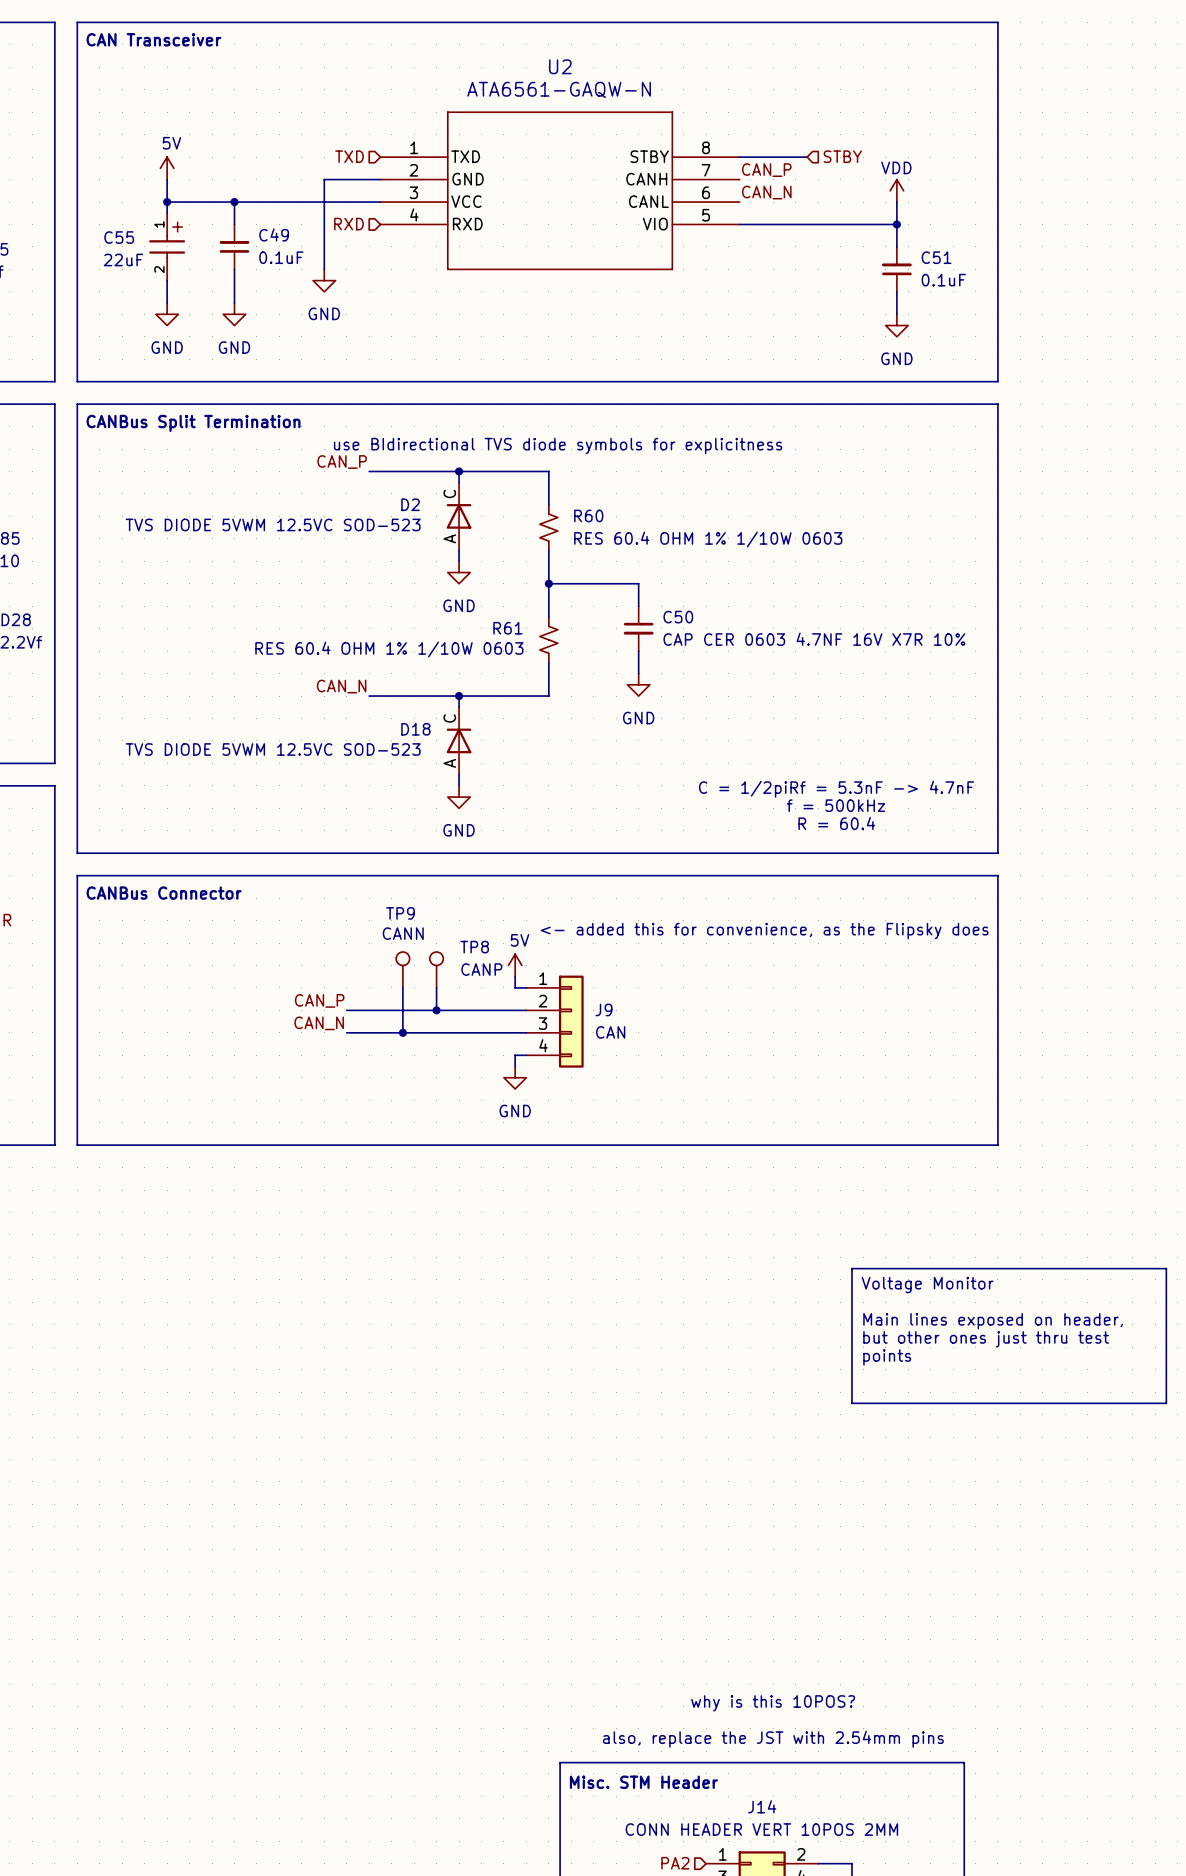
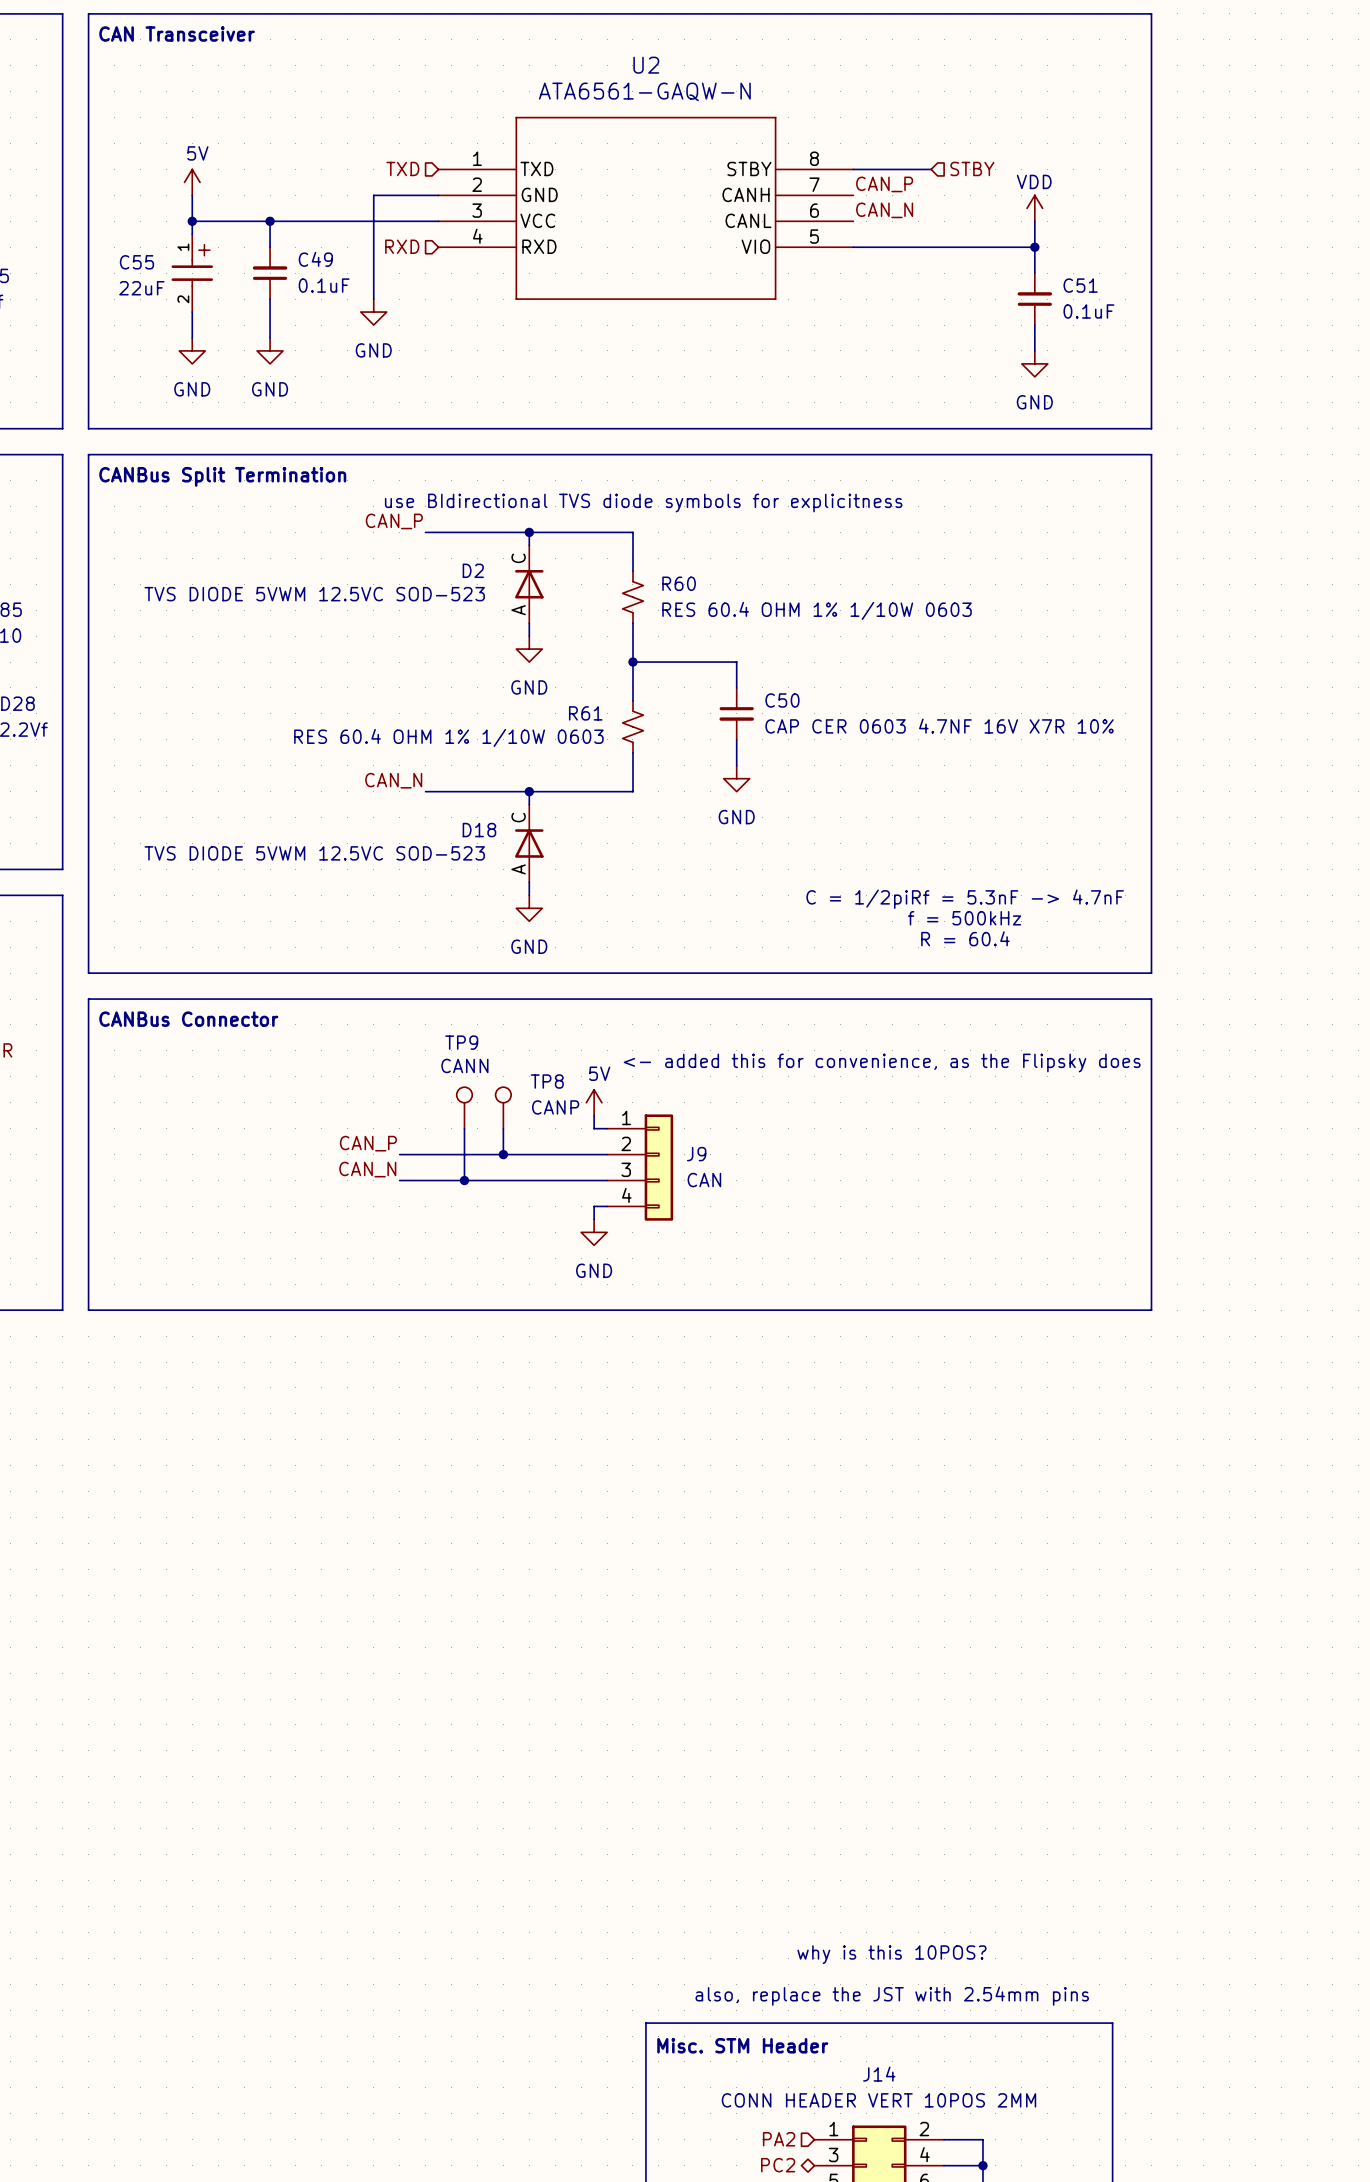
line: (851, 1268) (1166, 1268) (1166, 1403) (851, 1403) (851, 1268) -> none
text: Voltage Monitor (927, 1285) -> none
text: Main lines exposed on header, (993, 1321) -> none
text: but other ones just thru test (986, 1339) -> none
text: points (887, 1357) -> none

